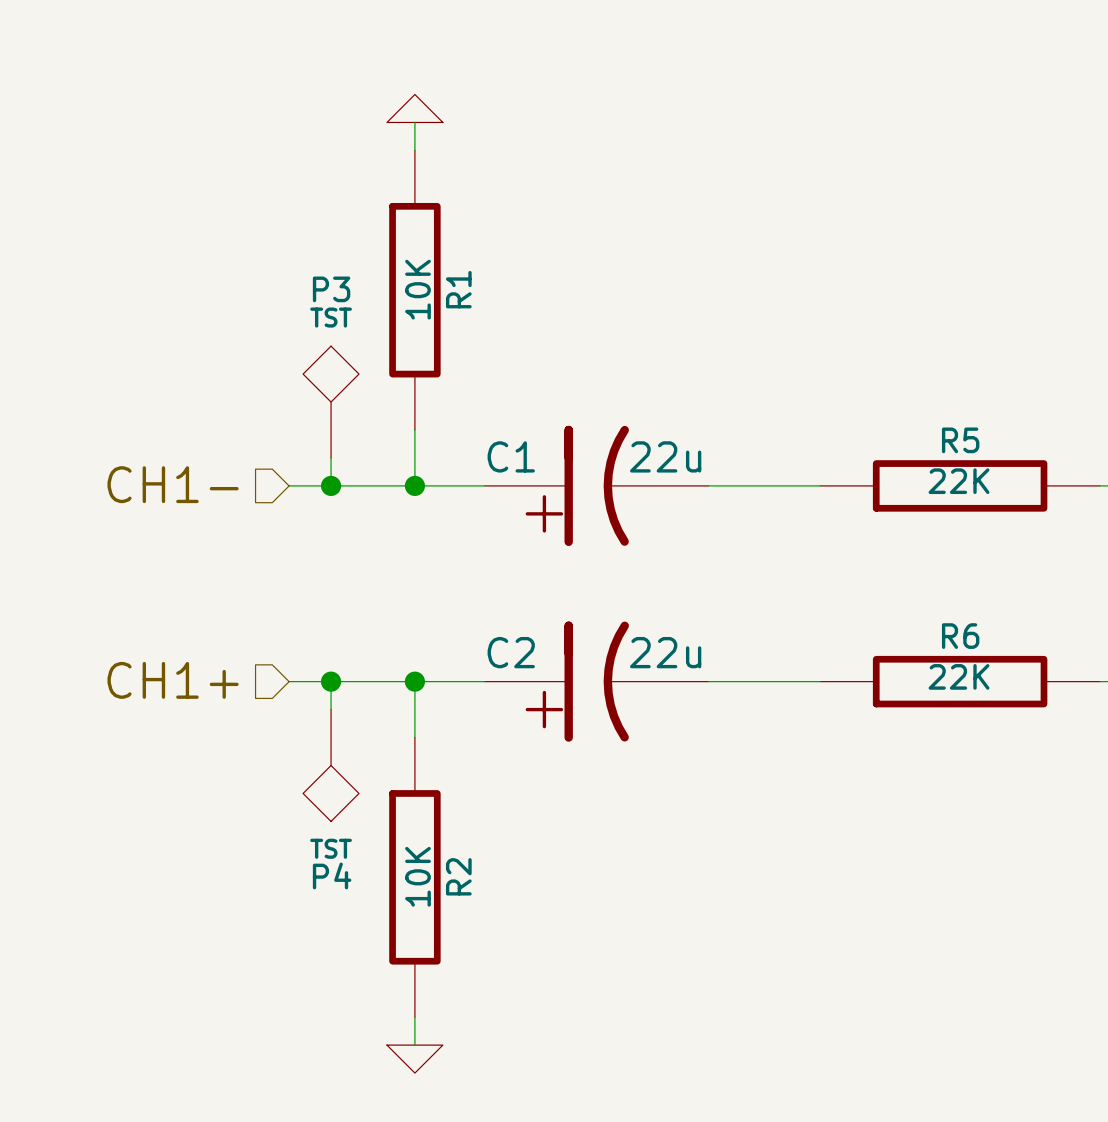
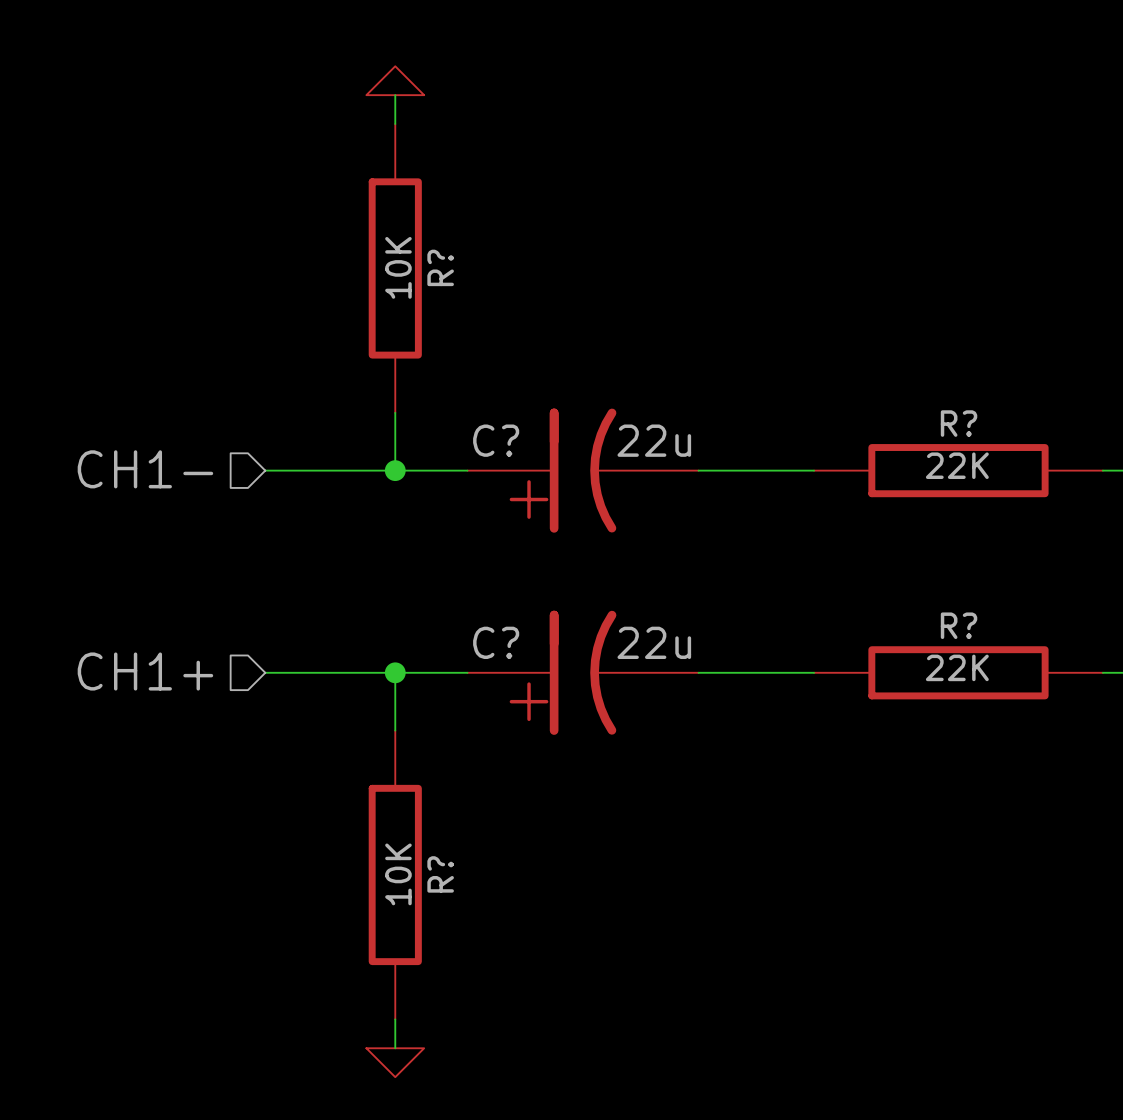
R1 name: R1 (458, 289) -> R? (440, 267)
P3: TST (331, 402) -> none
R5 name: R5 (960, 440) -> R? (959, 423)
C1 name: C1 (511, 456) -> C? (496, 440)
wire: (331, 457) (331, 485) -> none
junction: (331, 485) -> none
R6 name: R6 (960, 636) -> R? (959, 625)
C2 name: C2 (511, 652) -> C? (496, 642)
wire: (331, 681) (331, 709) -> none
junction: (331, 681) -> none
P4: TST (331, 765) -> none
R2 name: R2 (458, 876) -> R? (440, 874)

